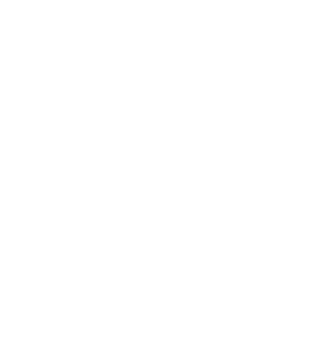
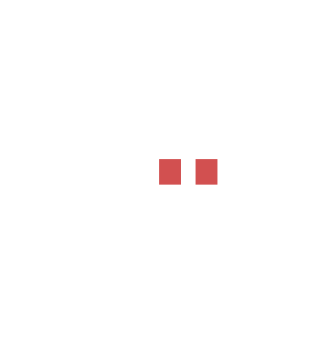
part: none -> (188, 171)

